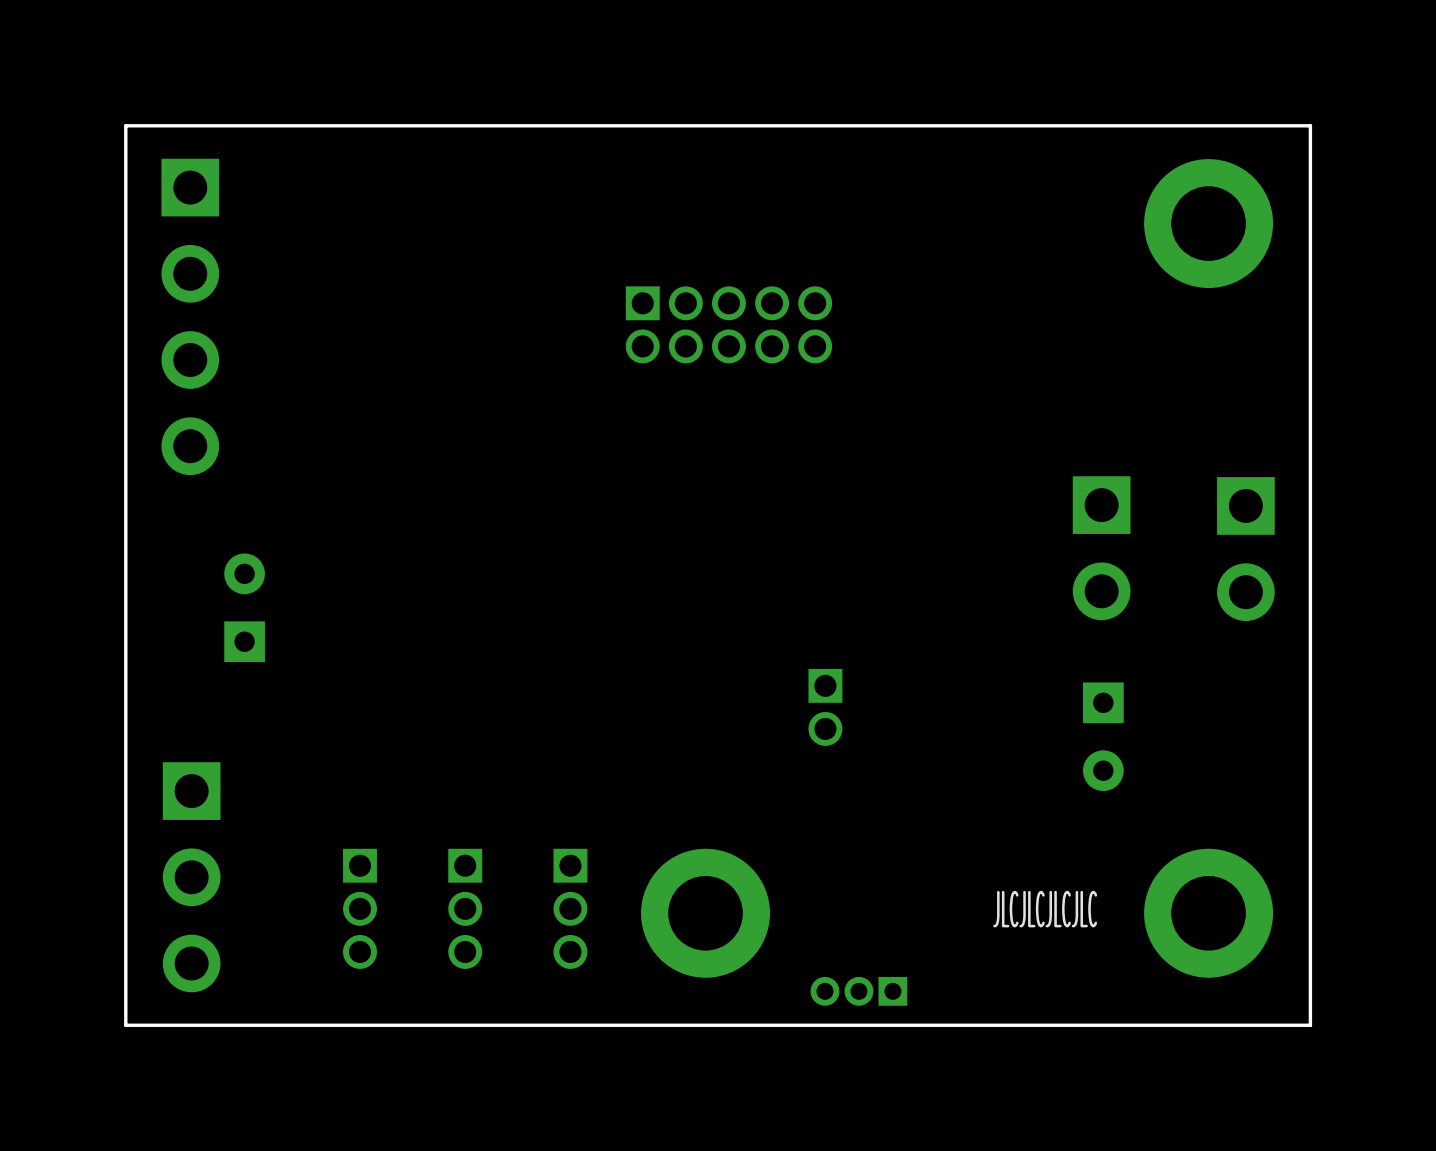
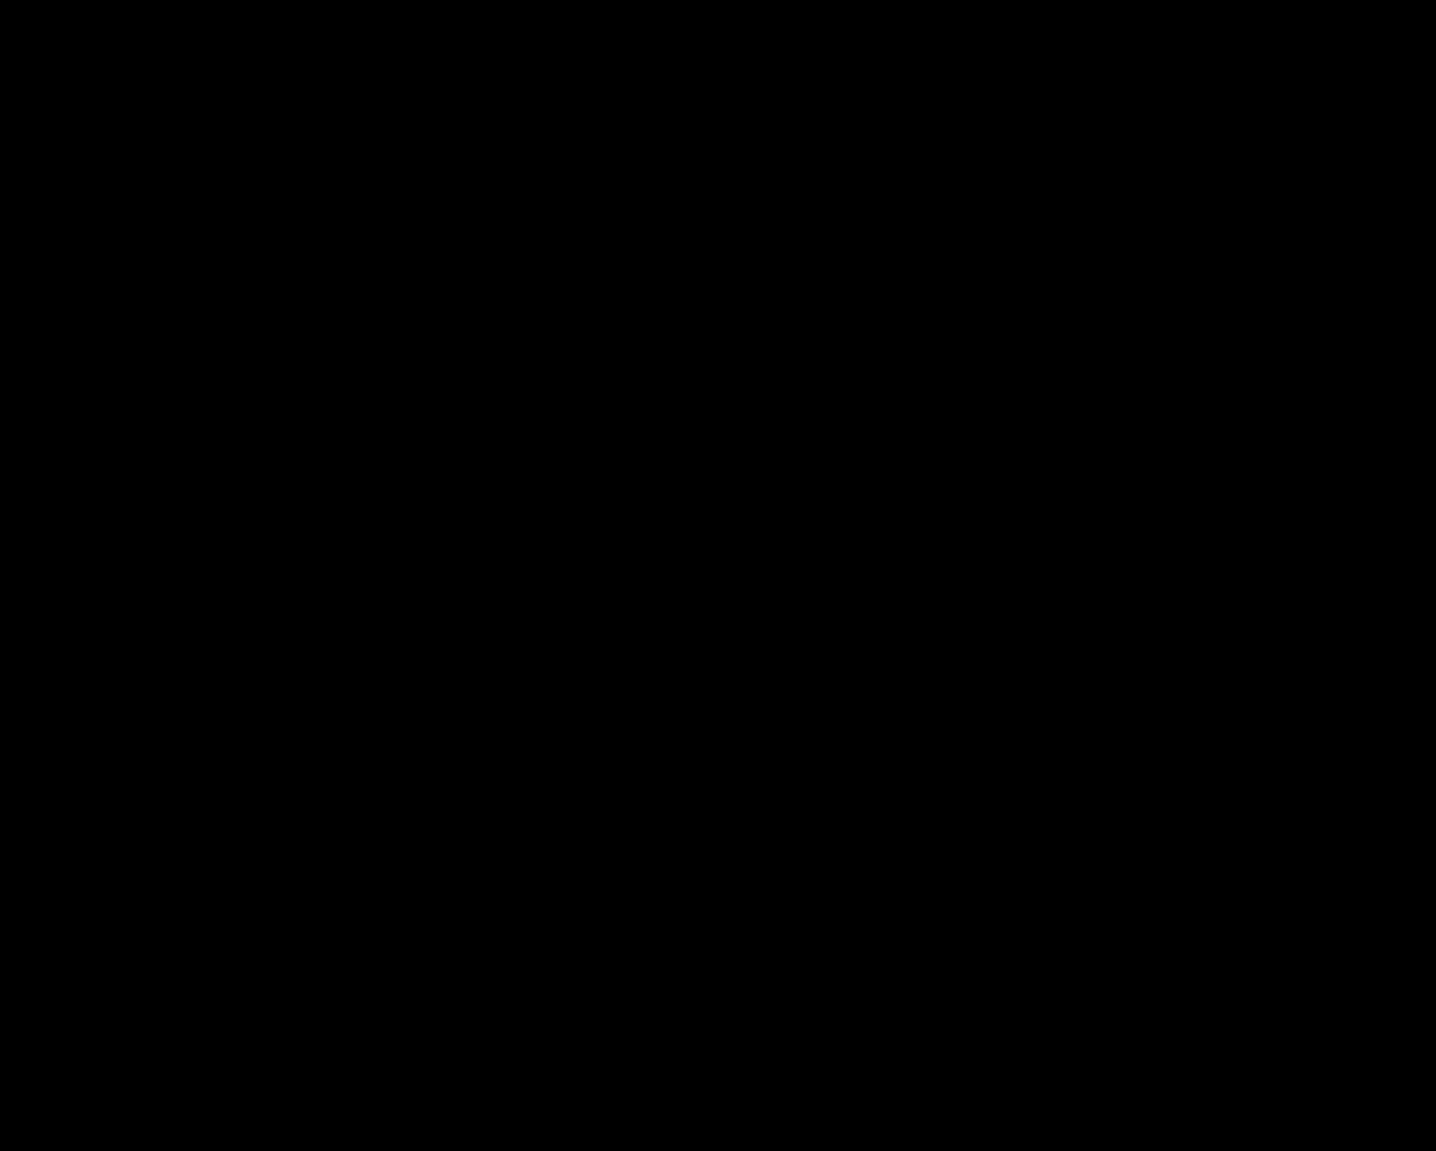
board edge: (1310, 125) (125, 125) (125, 1025) (1310, 1025) (1310, 125) -> none
part: (1208, 223) -> none
part: (190, 316) -> none
part: (728, 324) -> none
part: (1101, 548) -> none
part: (1245, 549) -> none
part: (244, 607) -> none
part: (825, 707) -> none
part: (1103, 736) -> none
part: (191, 877) -> none
part: (360, 908) -> none
part: (465, 908) -> none
part: (570, 908) -> none
text: JLCJLCJLCJLC (1045, 909) -> none
part: (705, 913) -> none
part: (1208, 913) -> none
part: (858, 991) -> none

